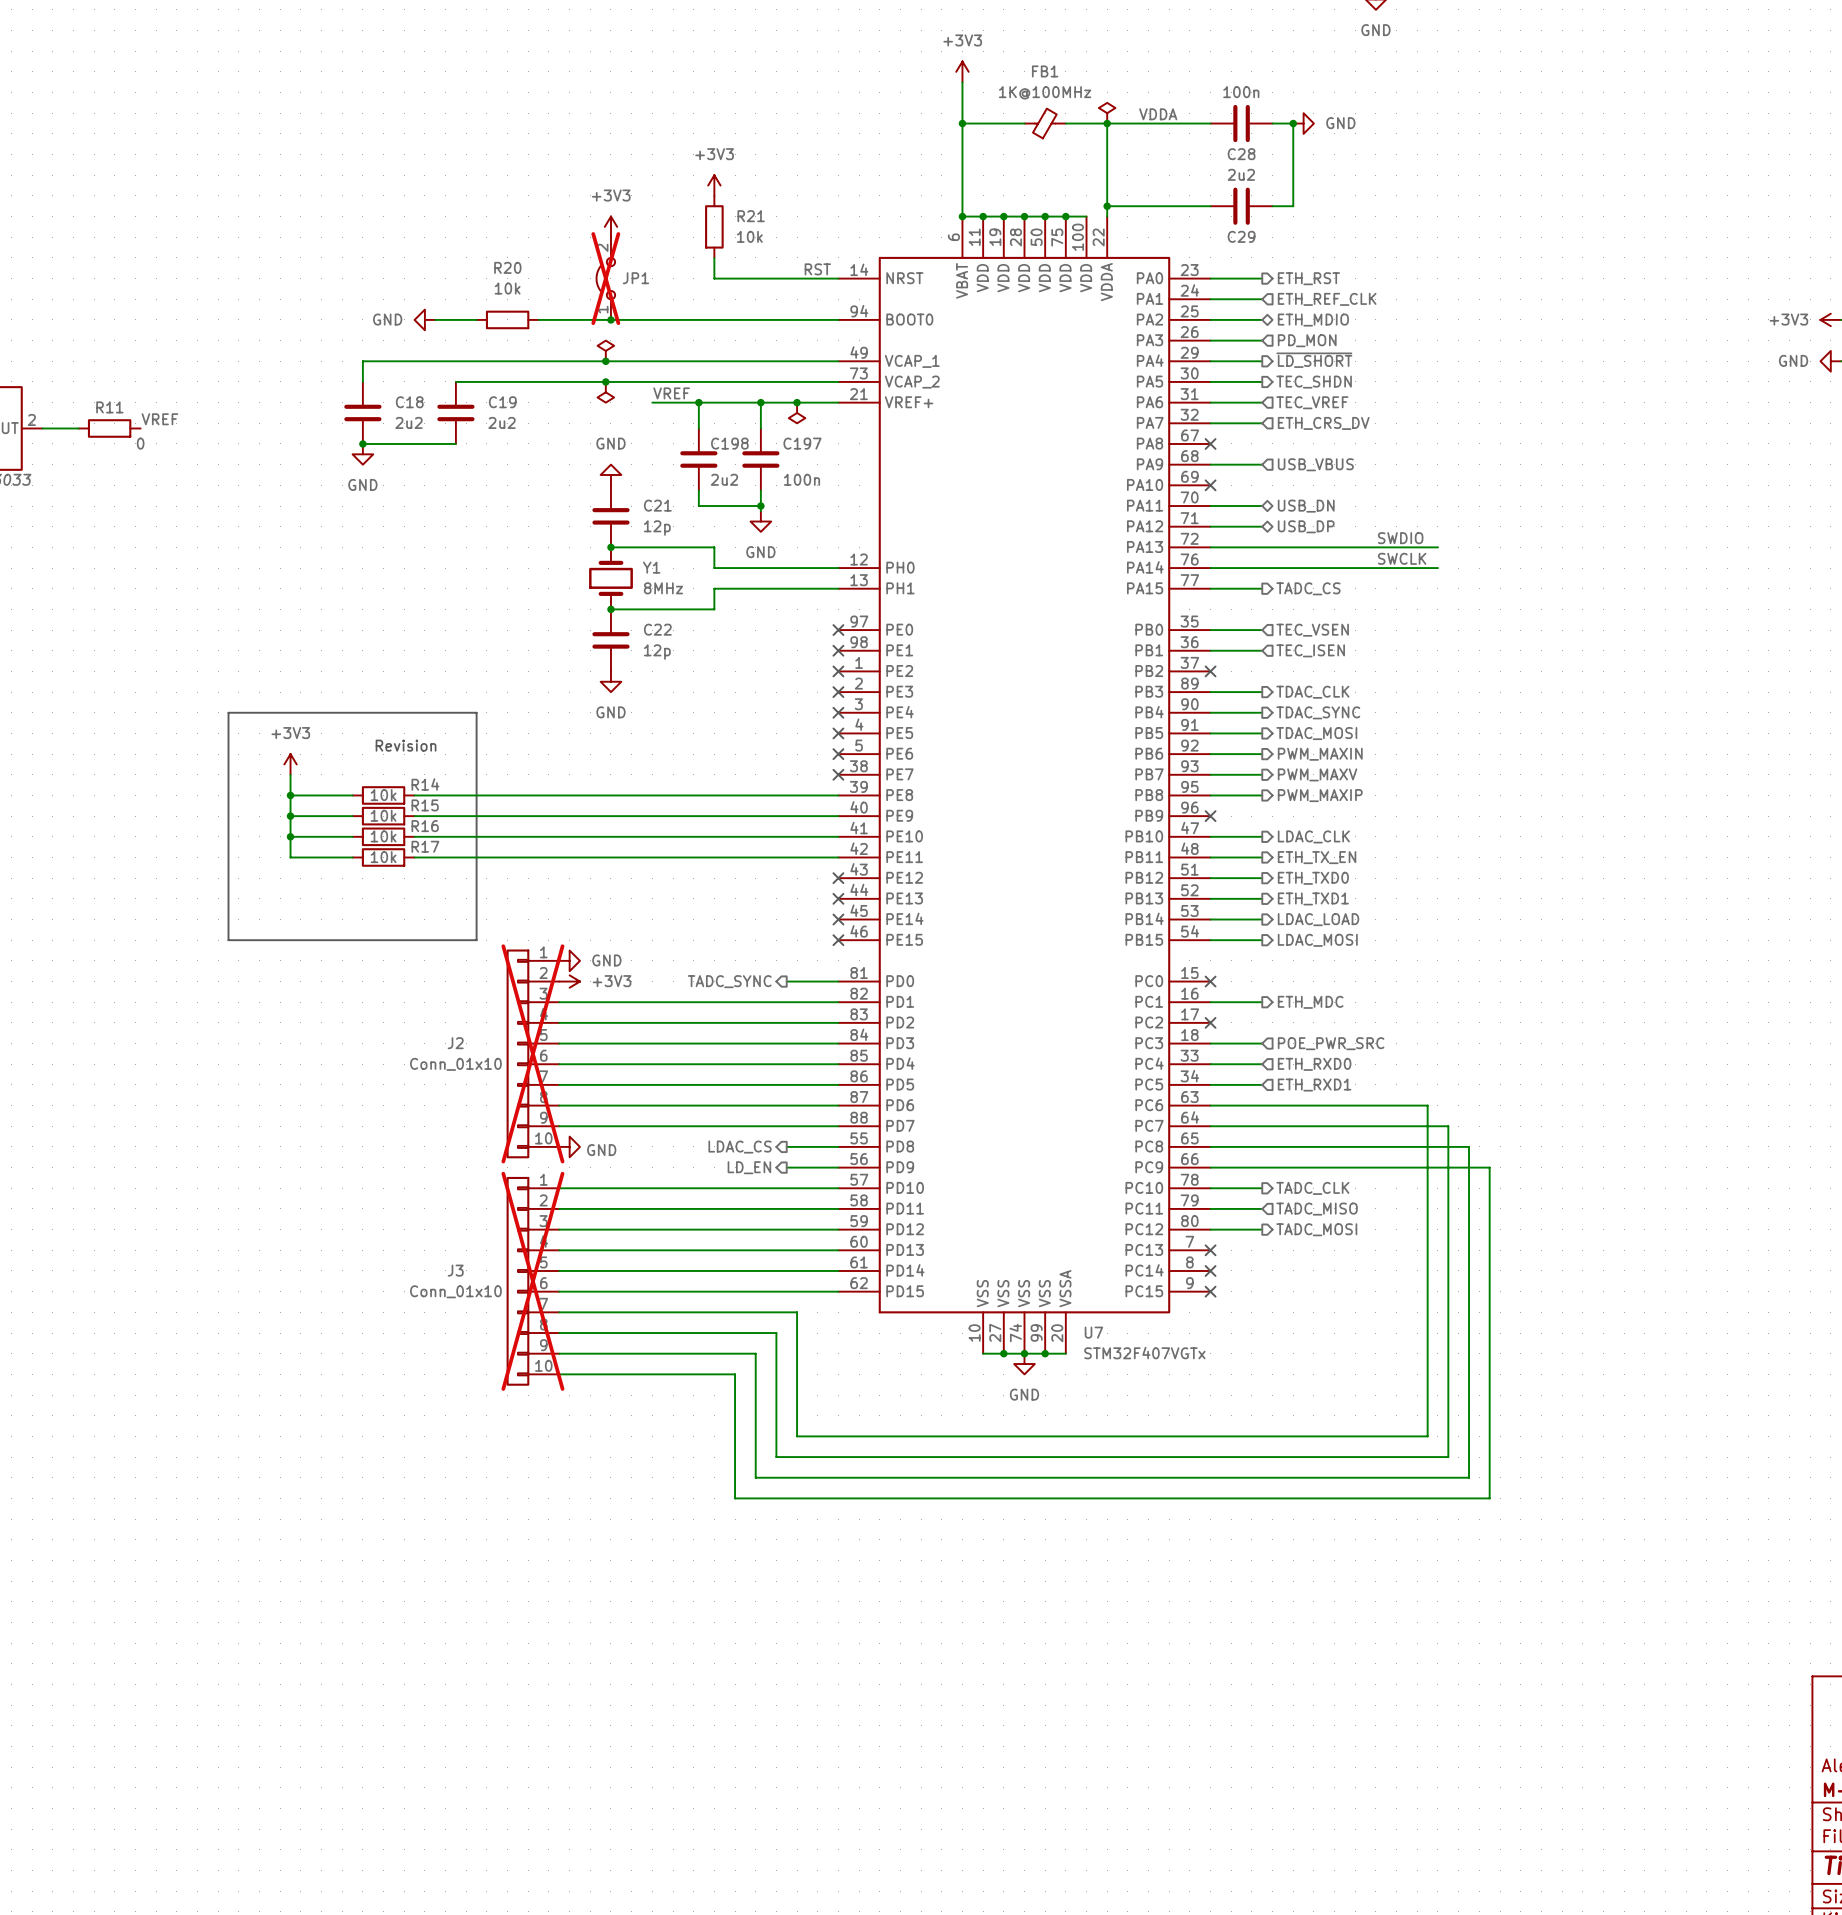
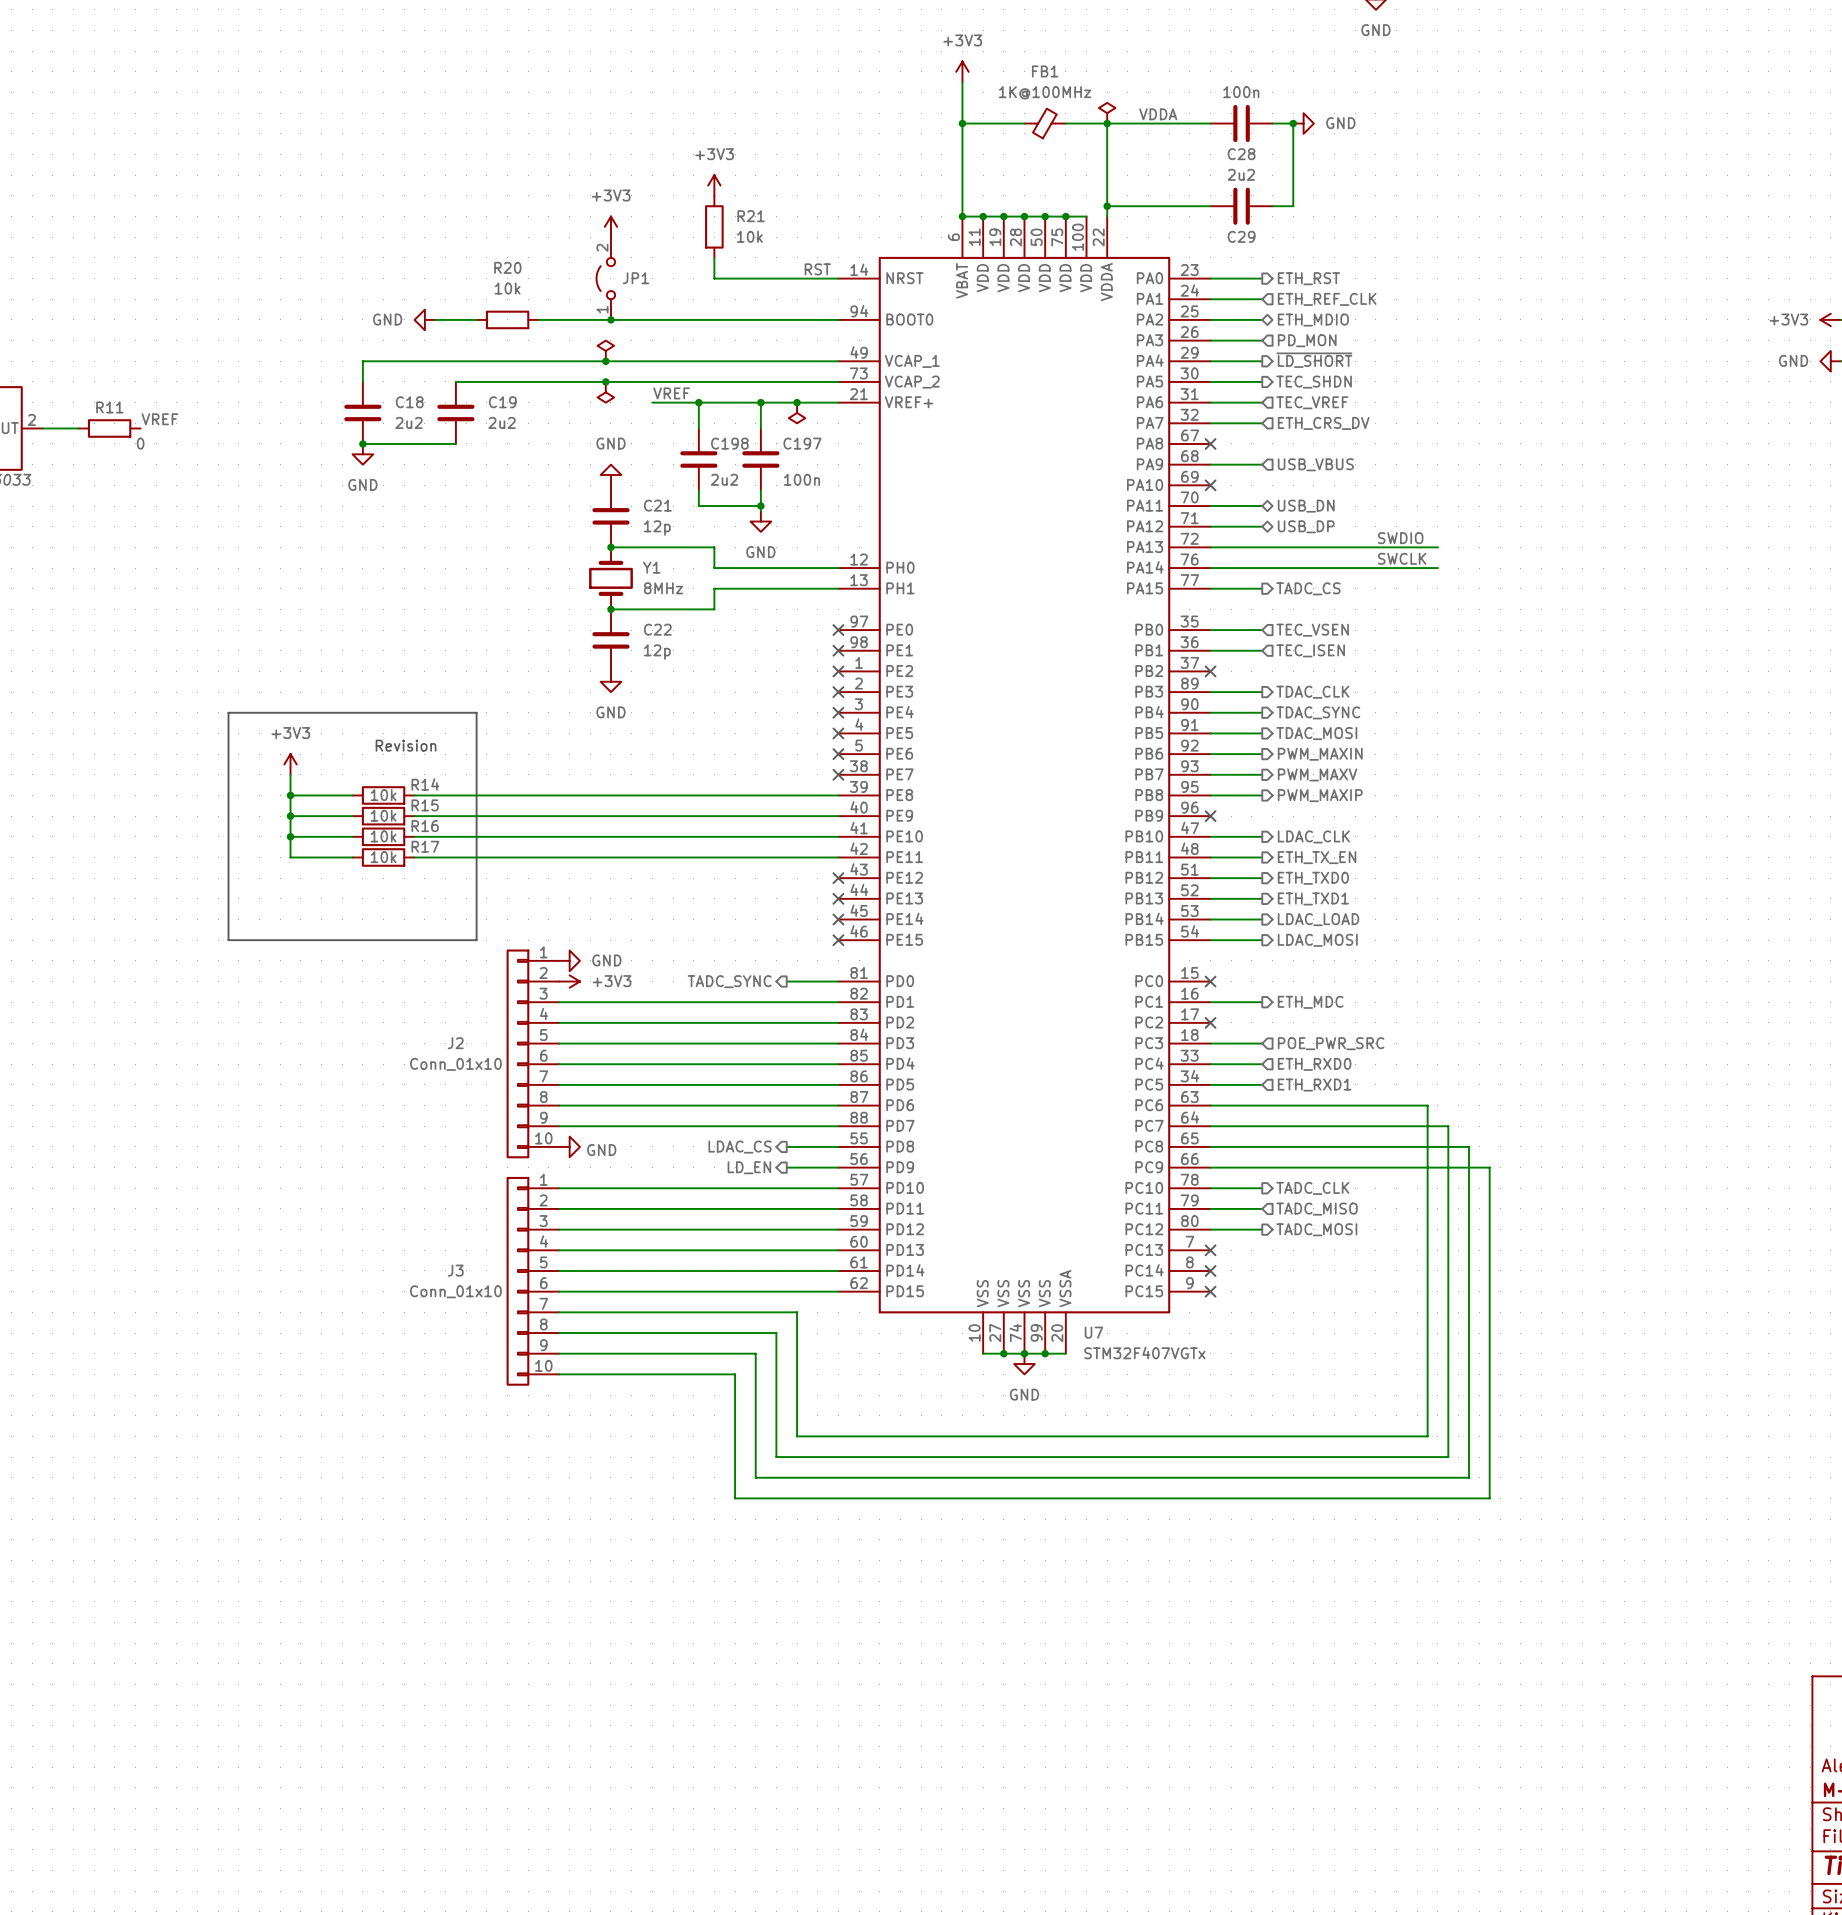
JP1 do-not-place cross: (605, 278) -> none
J2 do-not-place cross: (532, 1053) -> none
J3 do-not-place cross: (532, 1281) -> none

